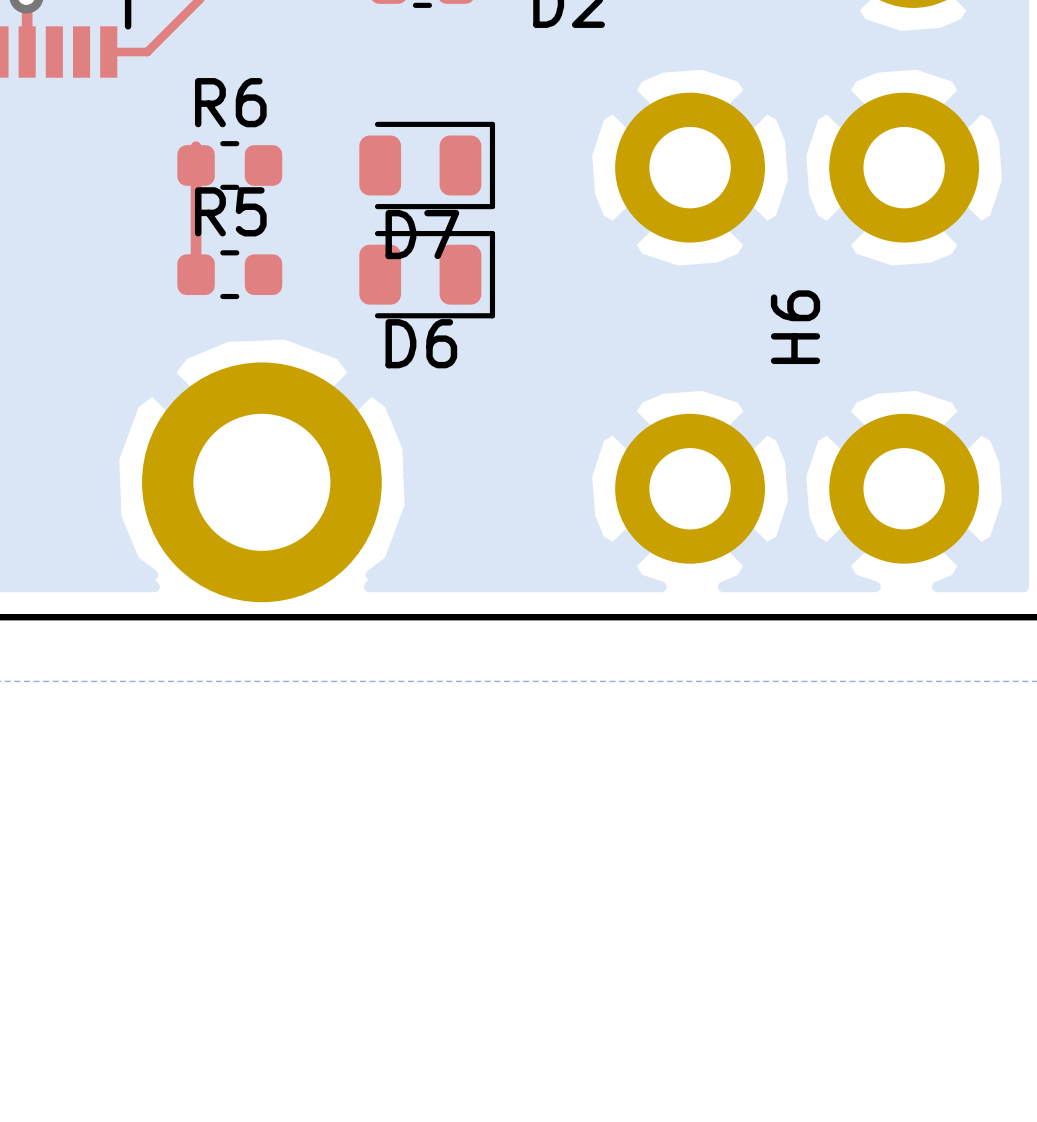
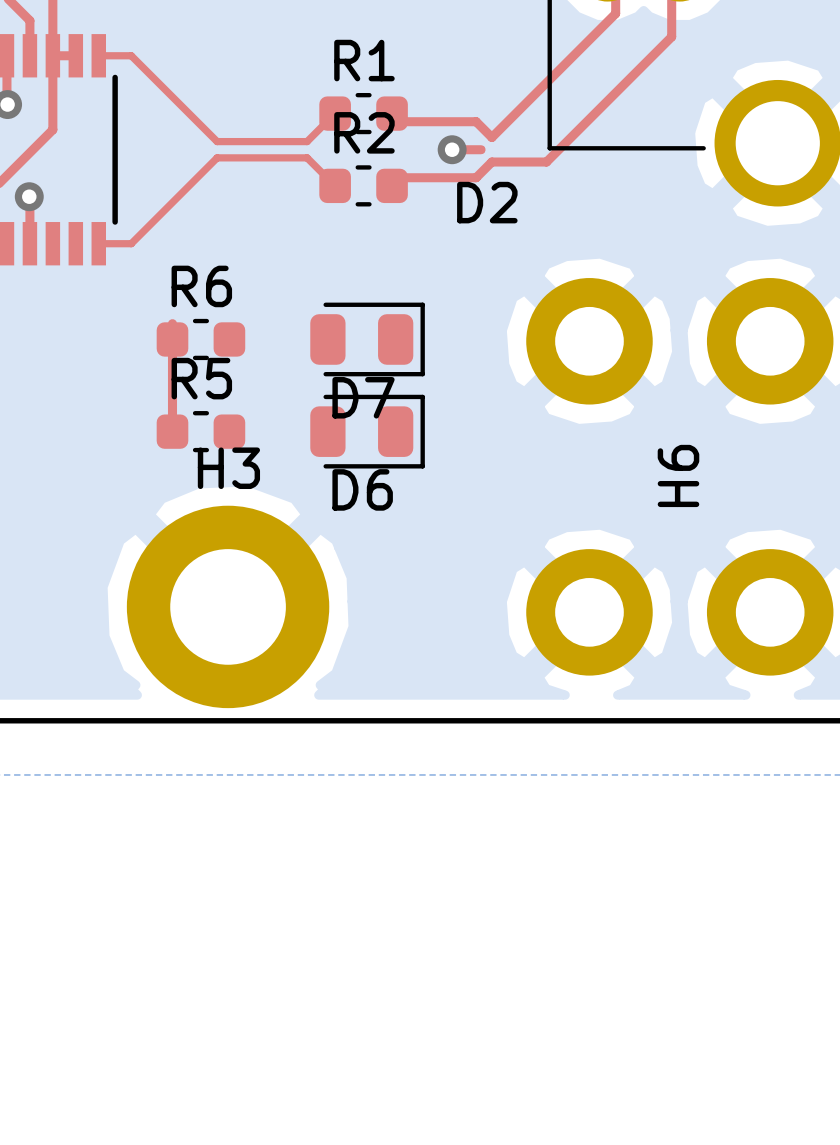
H3 name: none -> H3 (228, 468)

